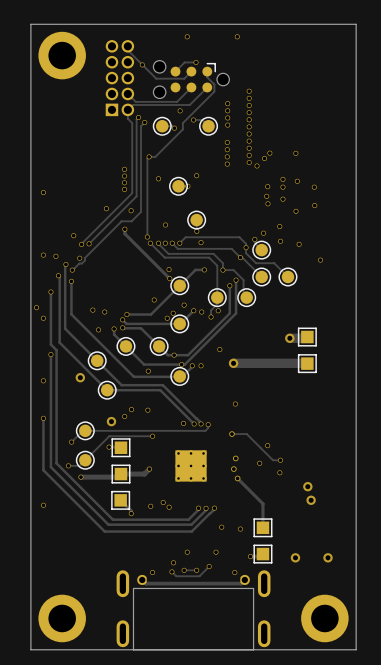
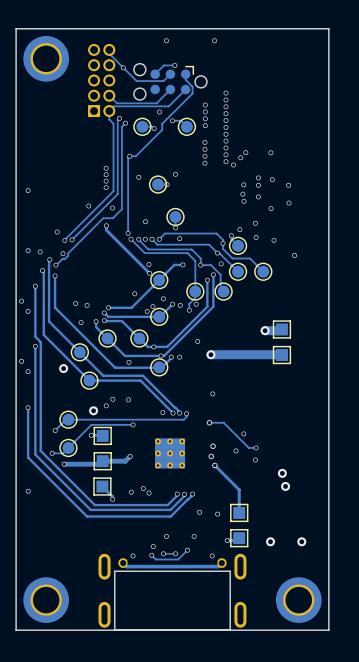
via: none -> (221, 263)
via: none -> (21, 361)

